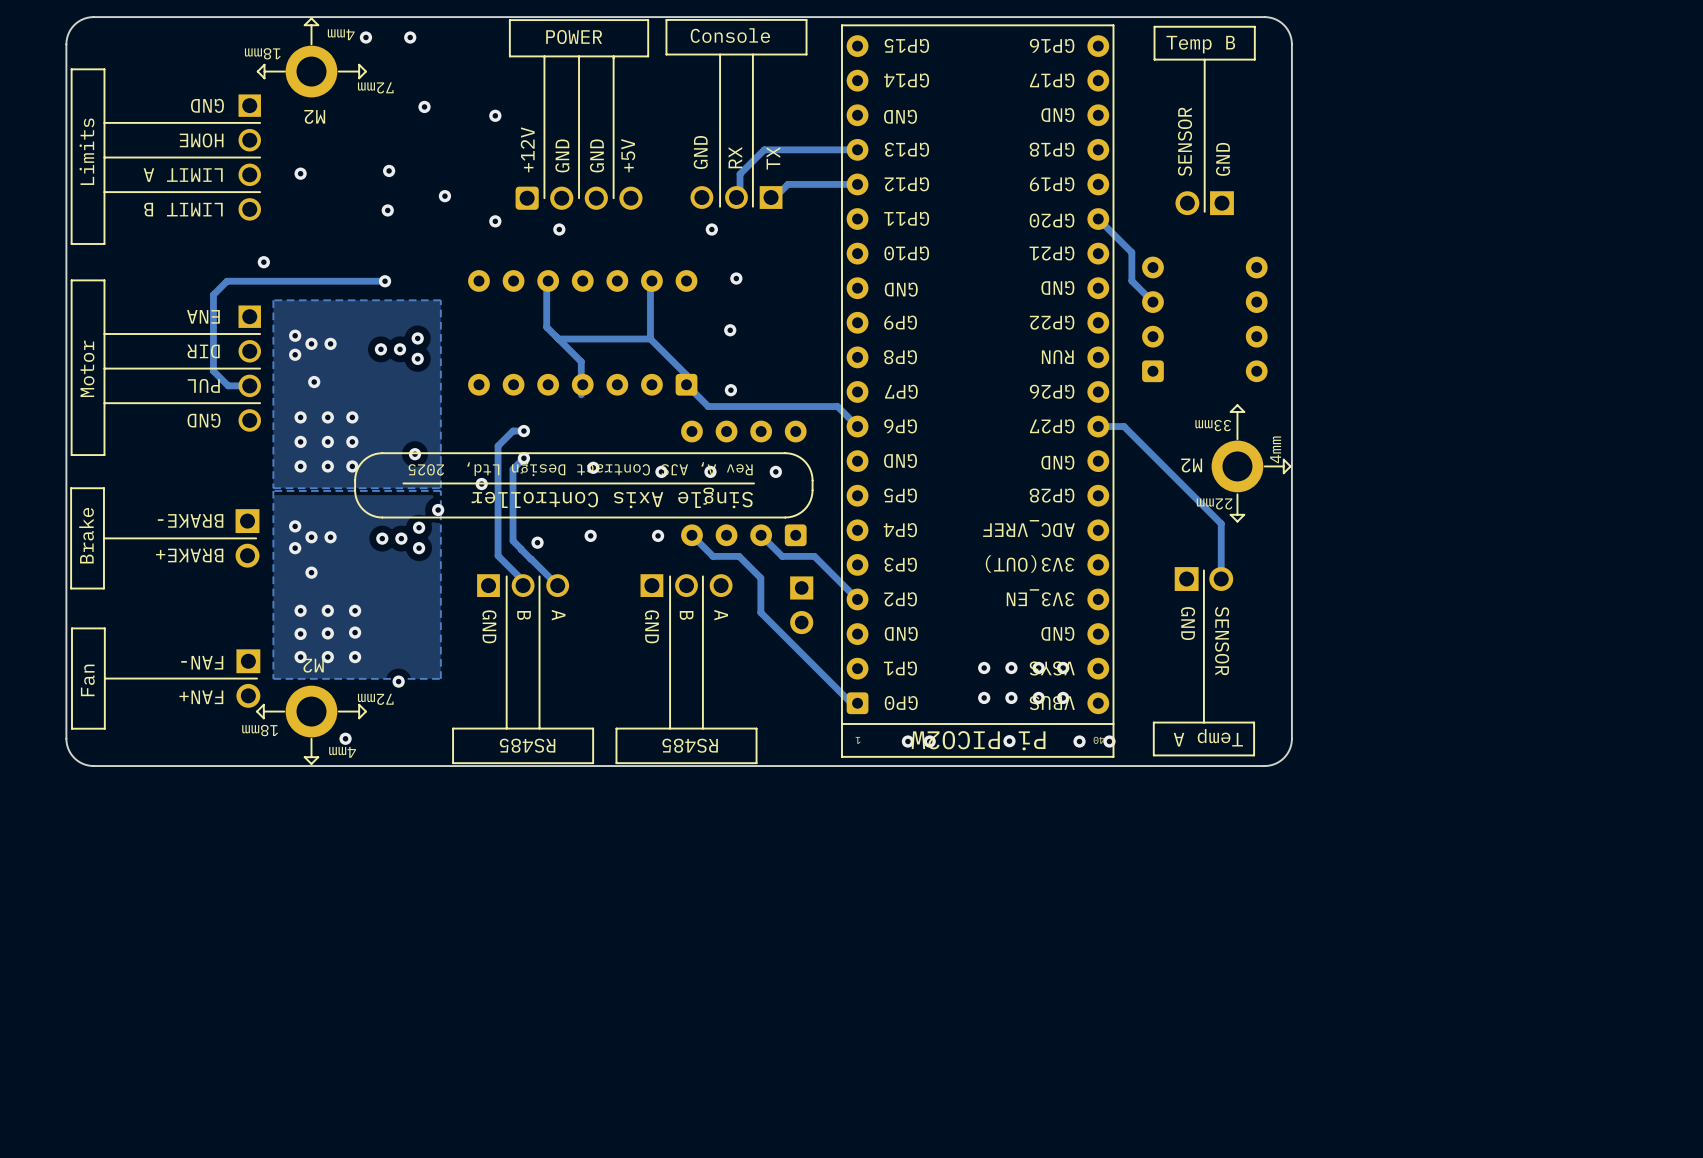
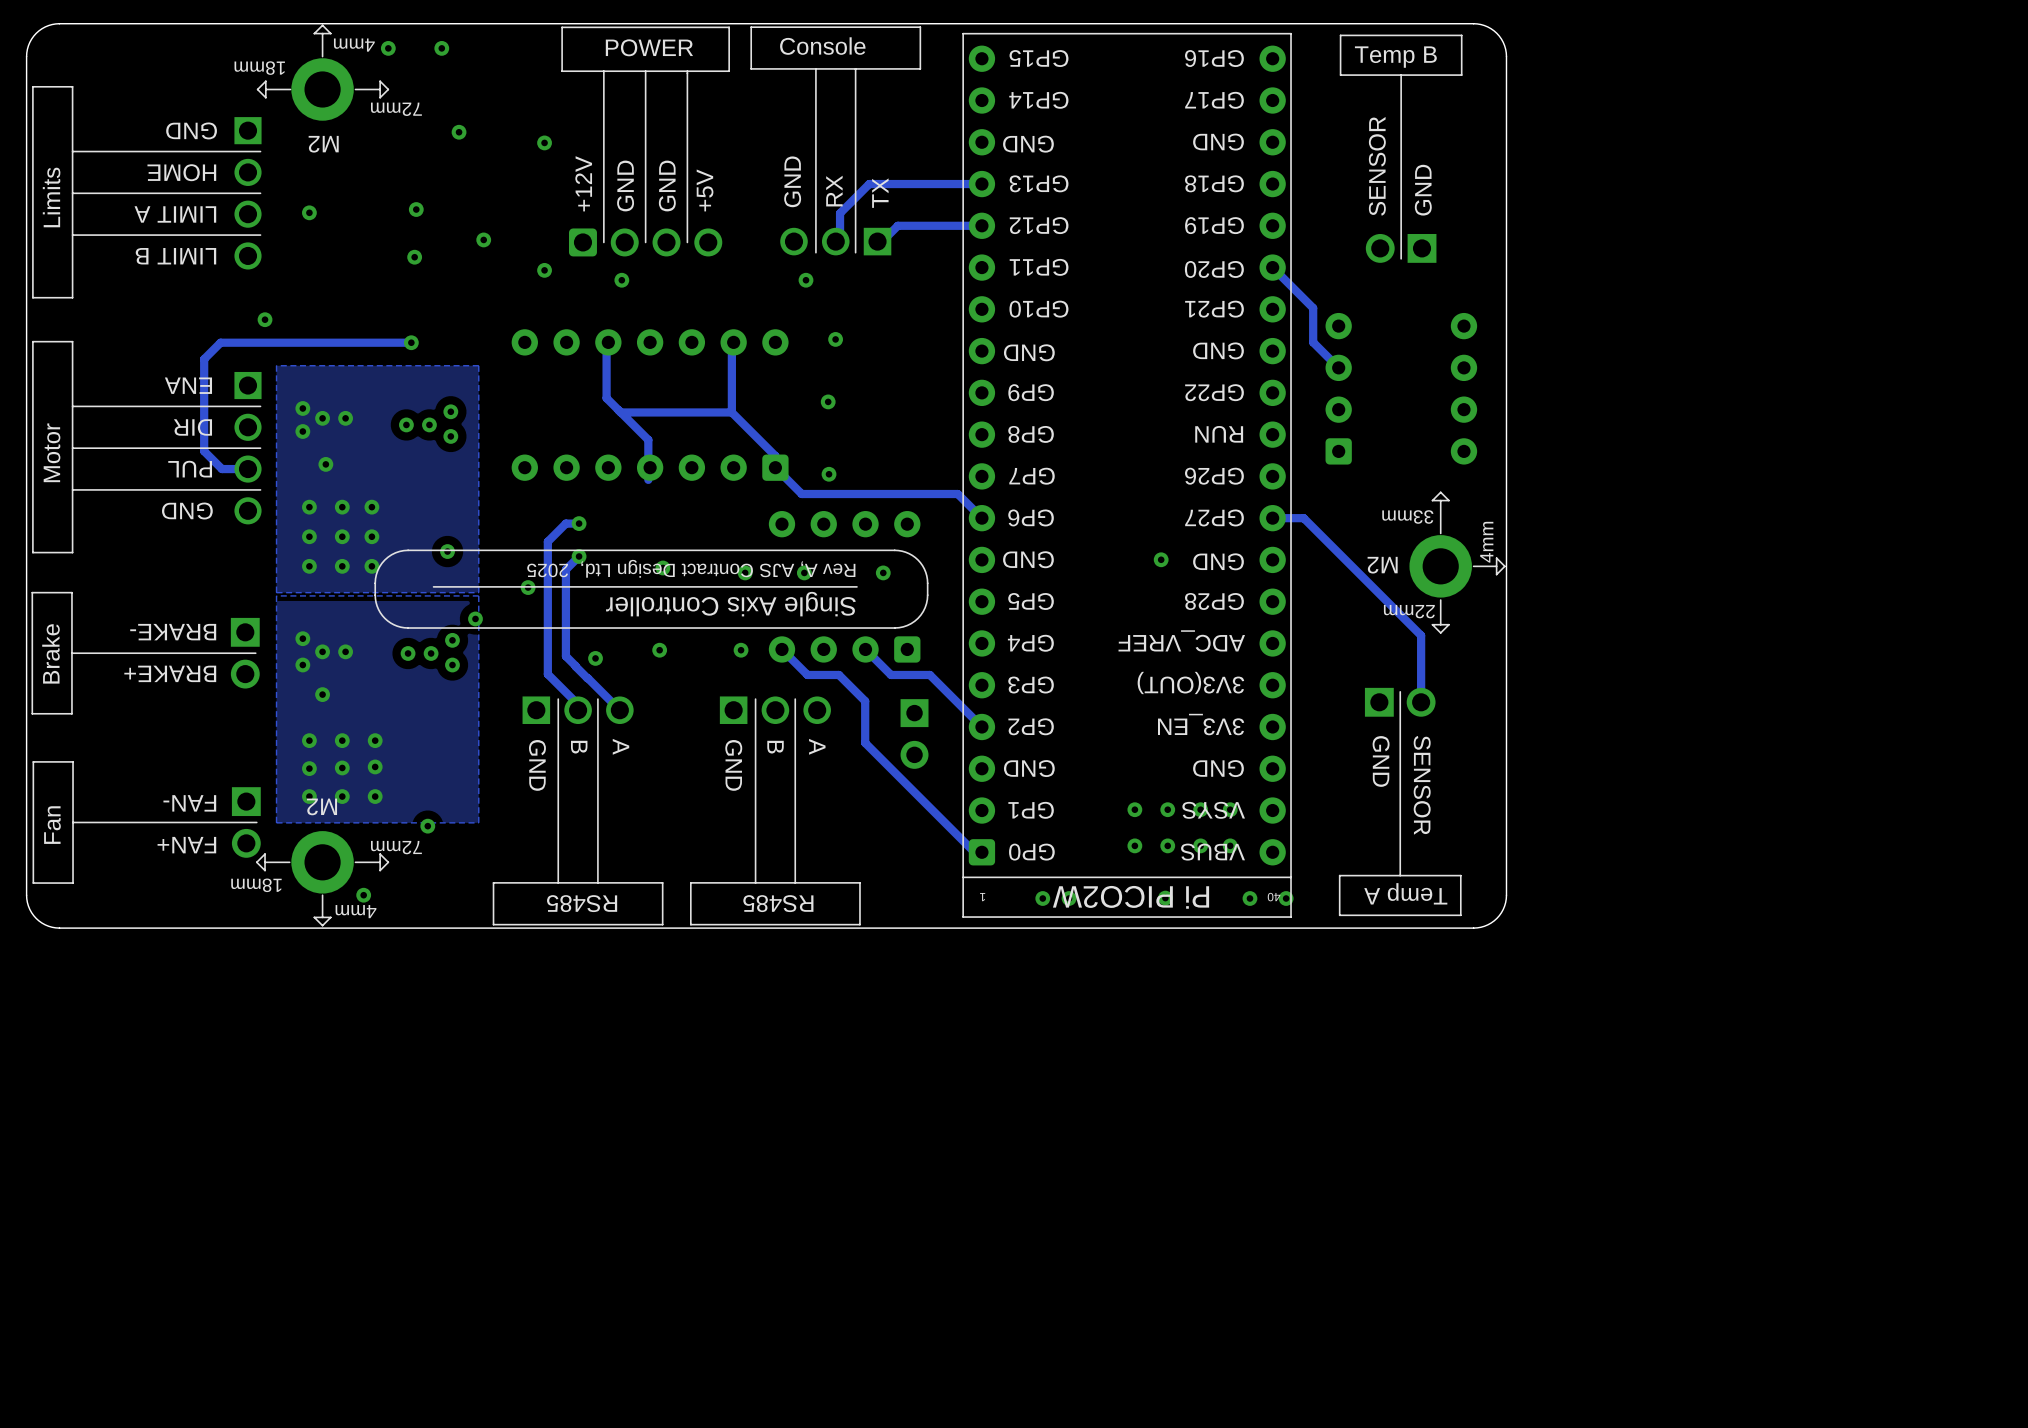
via: none -> (1161, 559)

